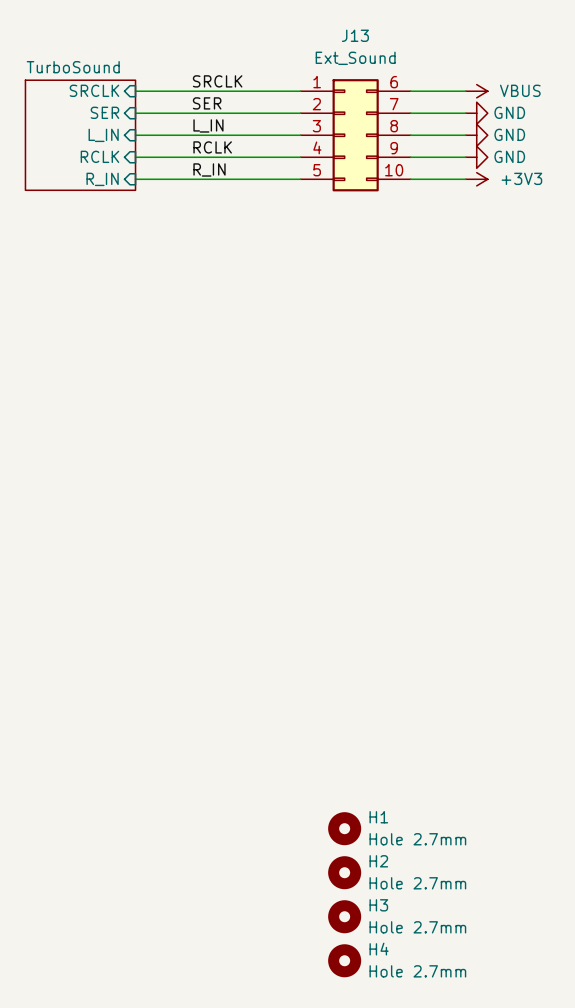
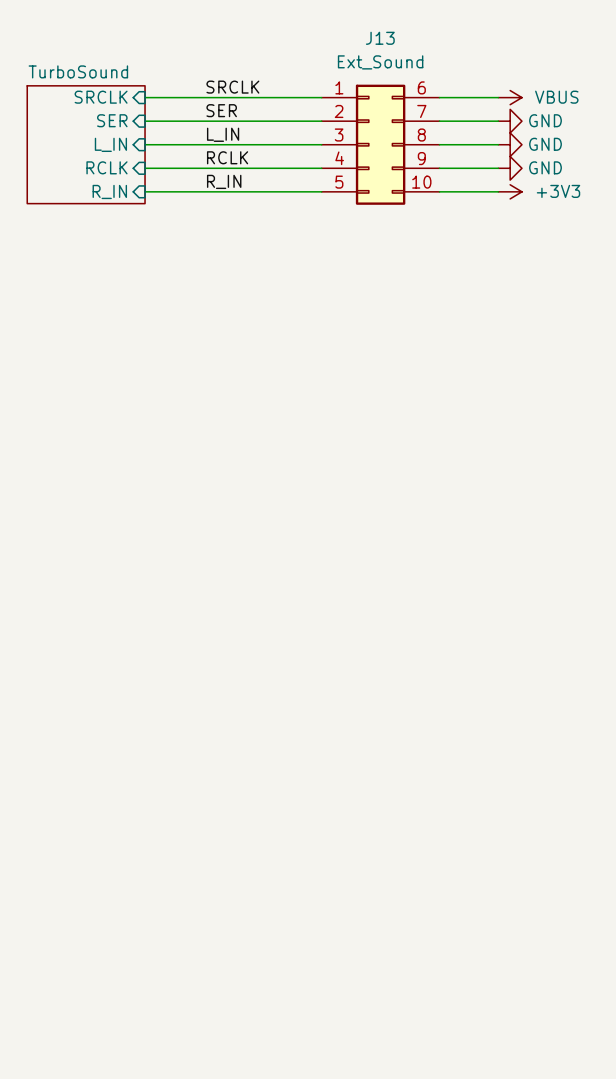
H1: Hole 2.7mm (344, 828) -> none
H2: Hole 2.7mm (344, 872) -> none
H3: Hole 2.7mm (344, 916) -> none
H4: Hole 2.7mm (344, 960) -> none

